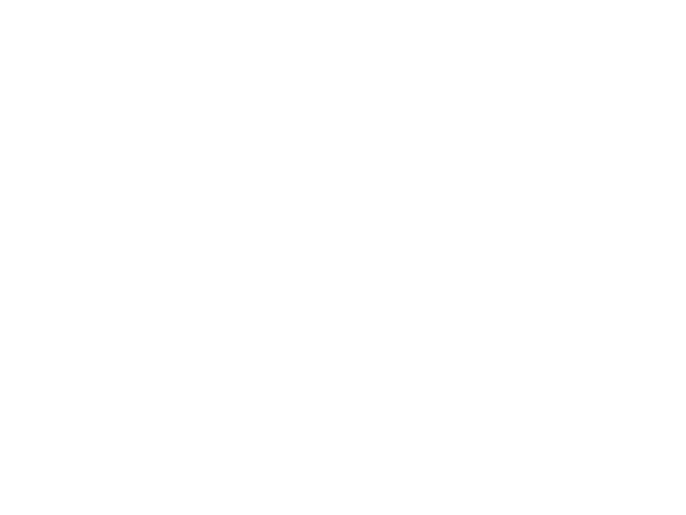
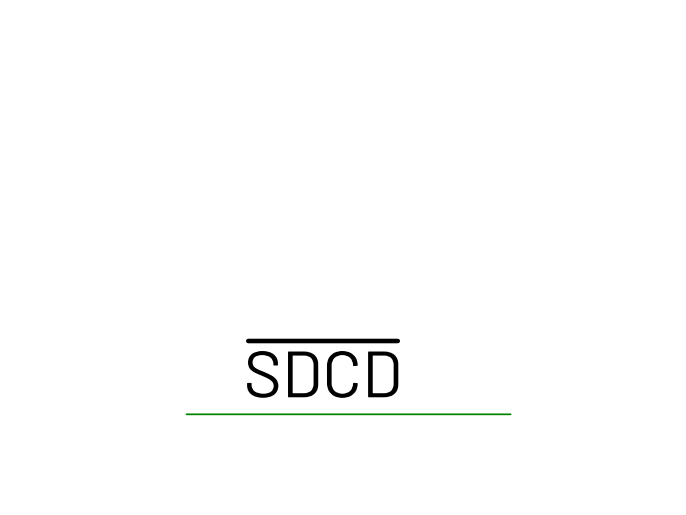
label: none -> ~{SDCD} (322, 369)
wire: none -> (186, 414) (510, 414)

